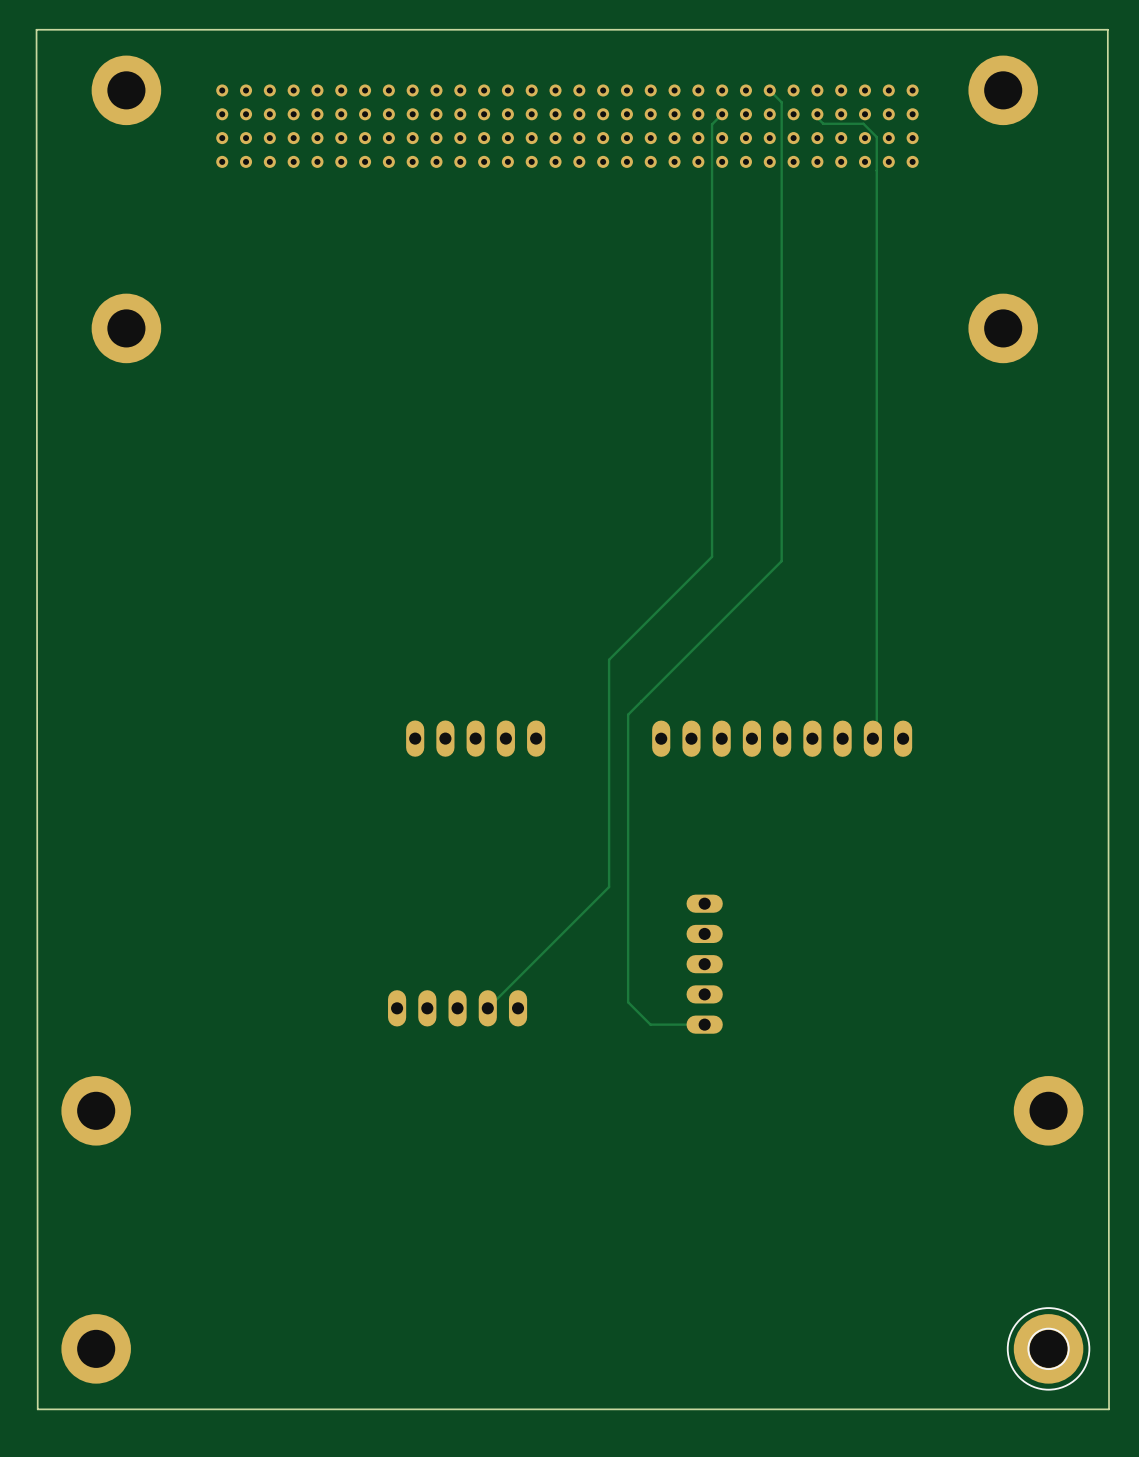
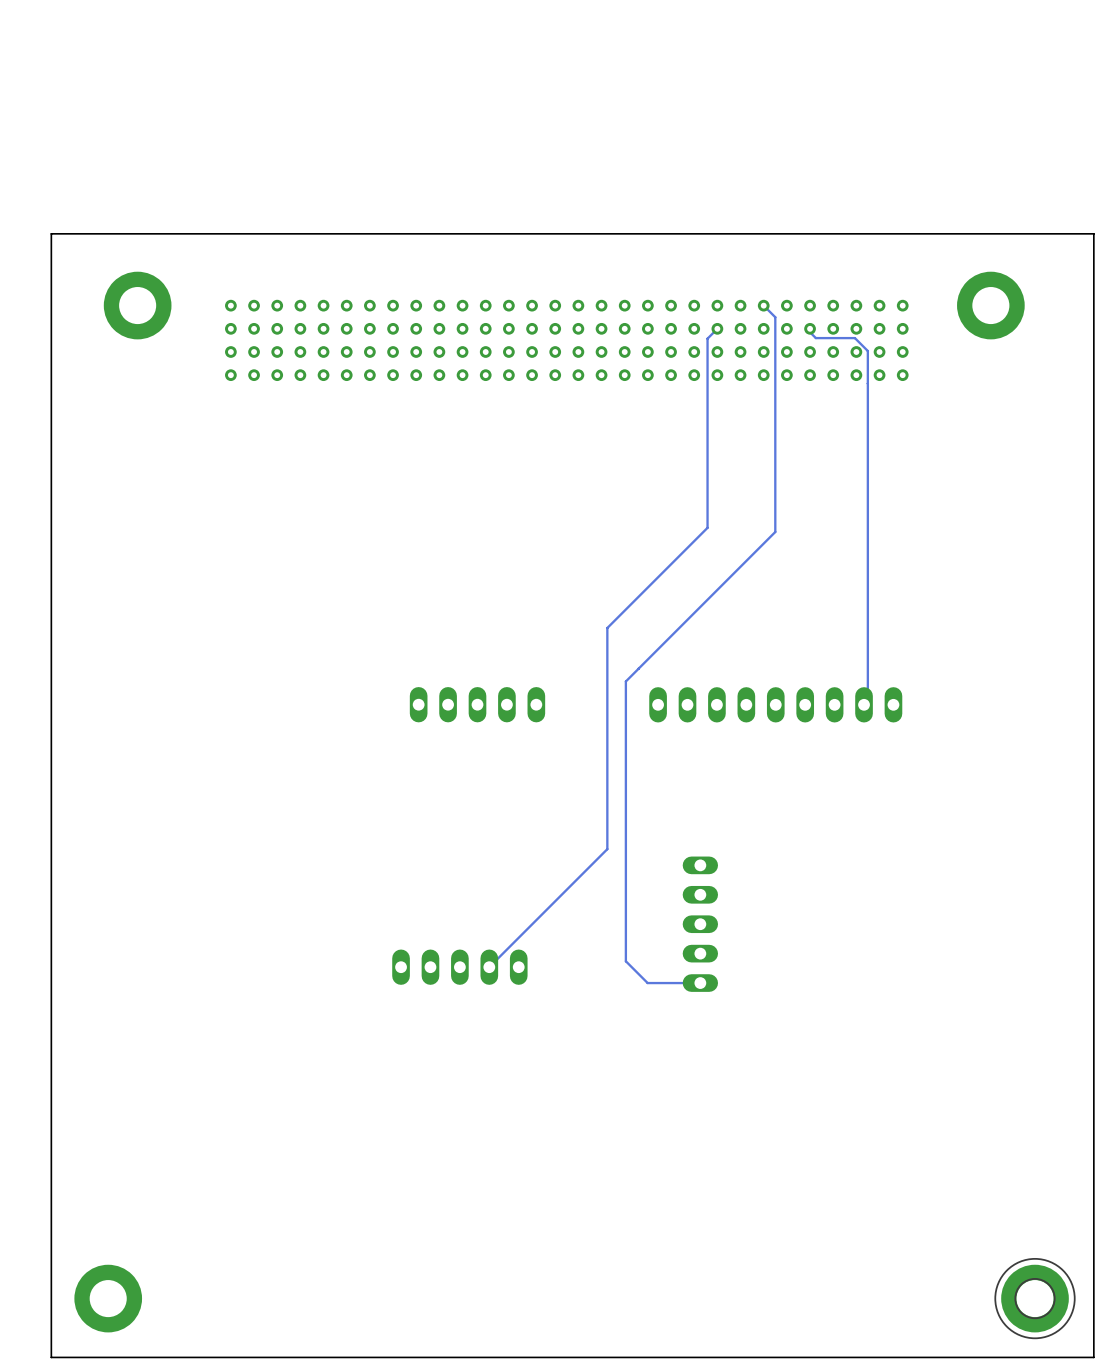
part: (126, 90) -> none
track: (769, 90) (781, 102) (781, 340) -> (763, 305) (775, 317)
part: (1003, 90) -> none
track: (722, 114) (712, 124) (712, 362) -> (717, 328) (707, 338)
track: (817, 114) (817, 117) (823, 123) (863, 123) (876, 137) (876, 375) -> (810, 328) (810, 332) (815, 338) (854, 338) (867, 351)
part position: (567, 126) -> (566, 340)
part: (96, 1110) -> none
part: (1048, 1110) -> none
board edge: (1109, 1409) (1107, 29) (36, 29) (37, 1409) -> (1093, 1357) (1093, 233) (51, 233) (51, 1357)

